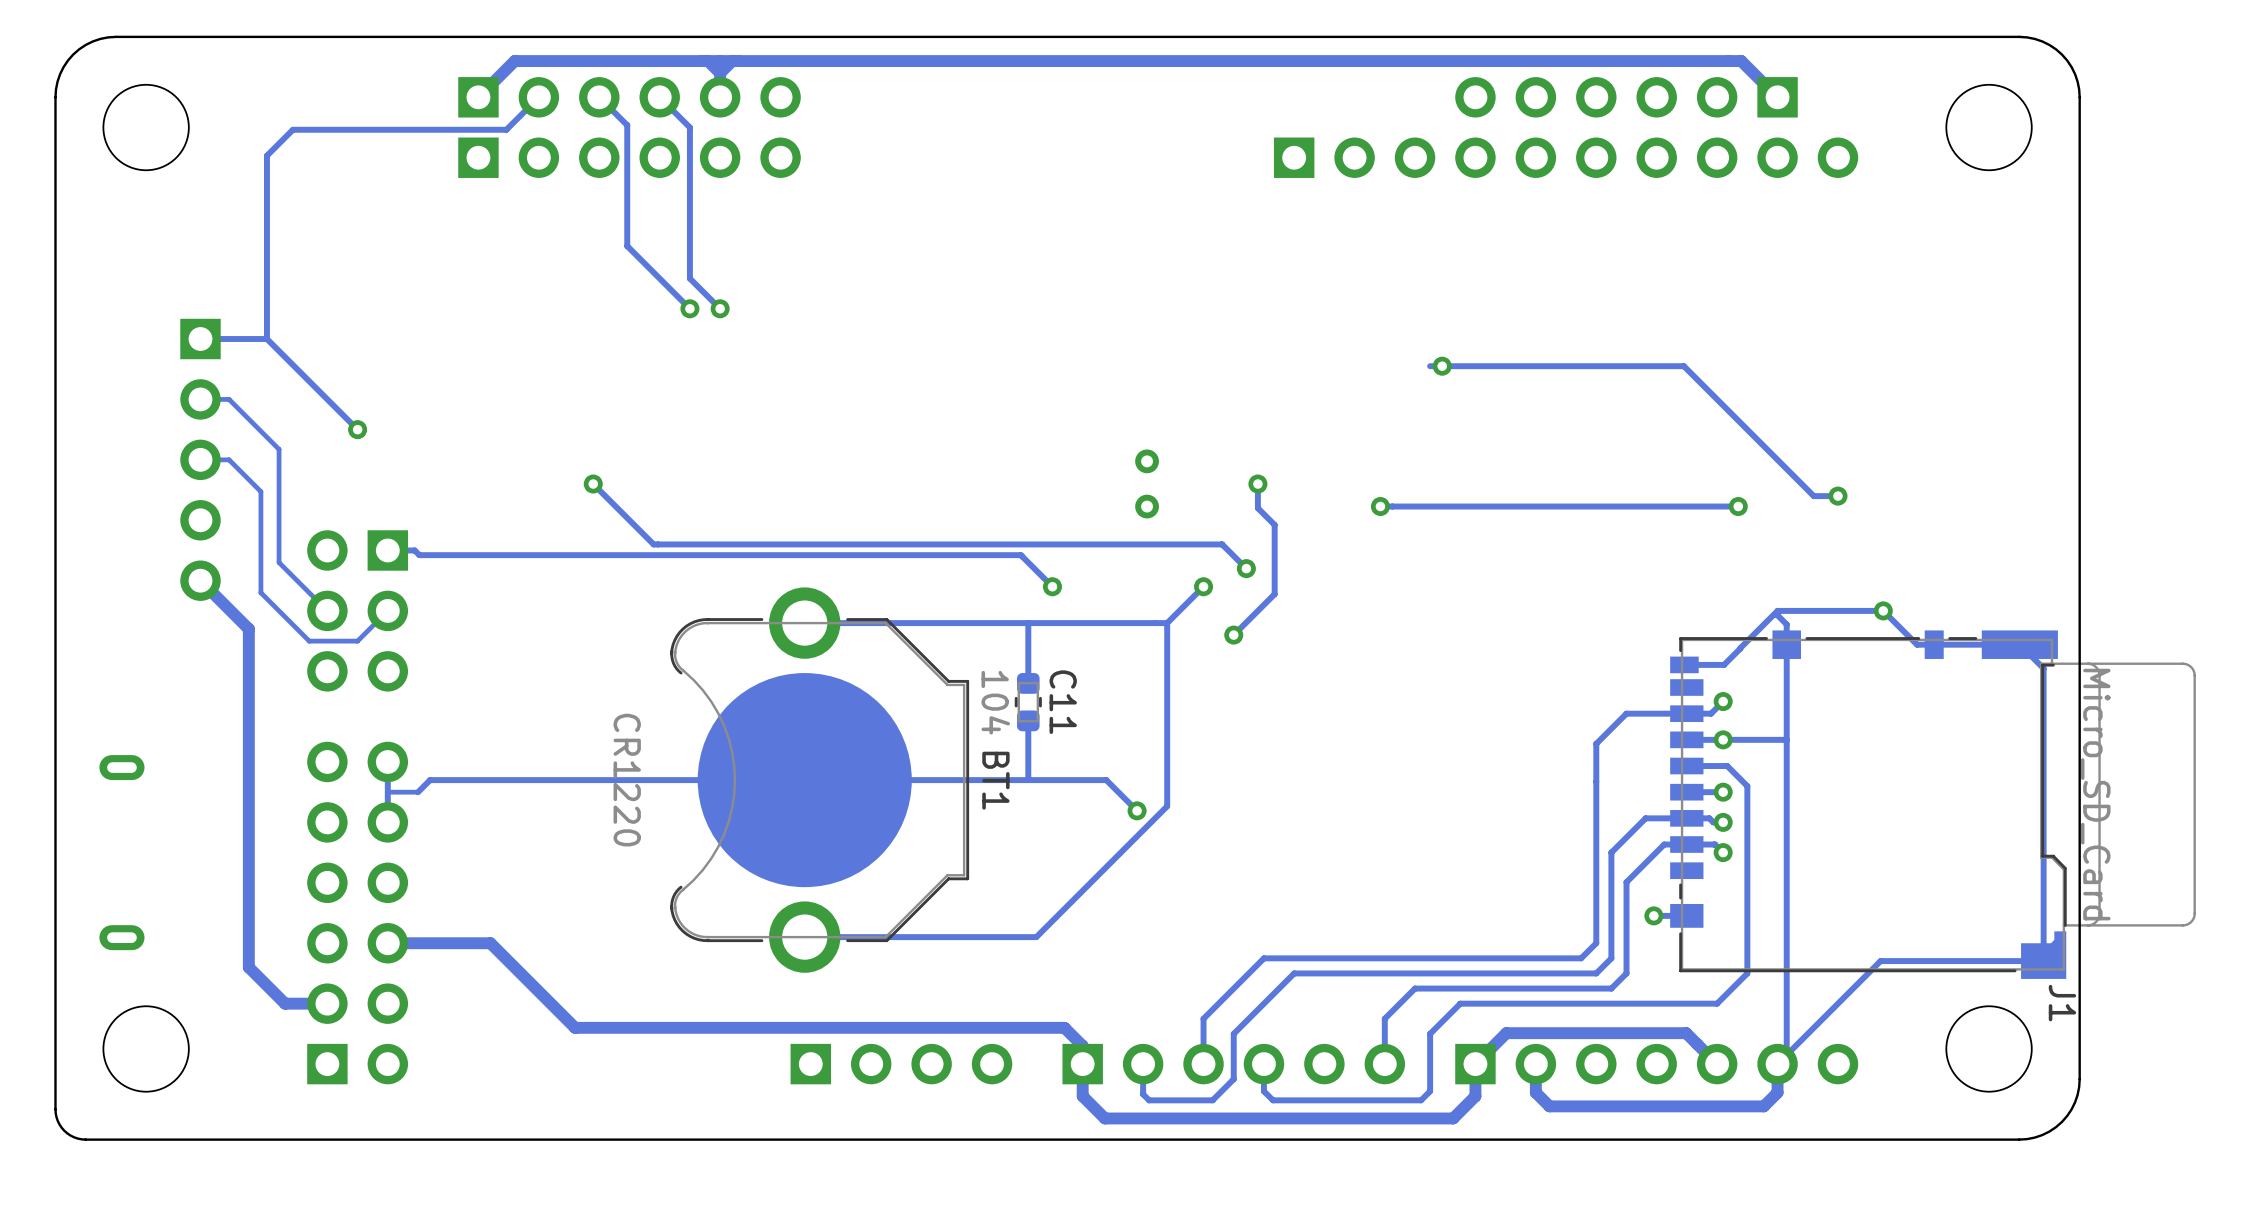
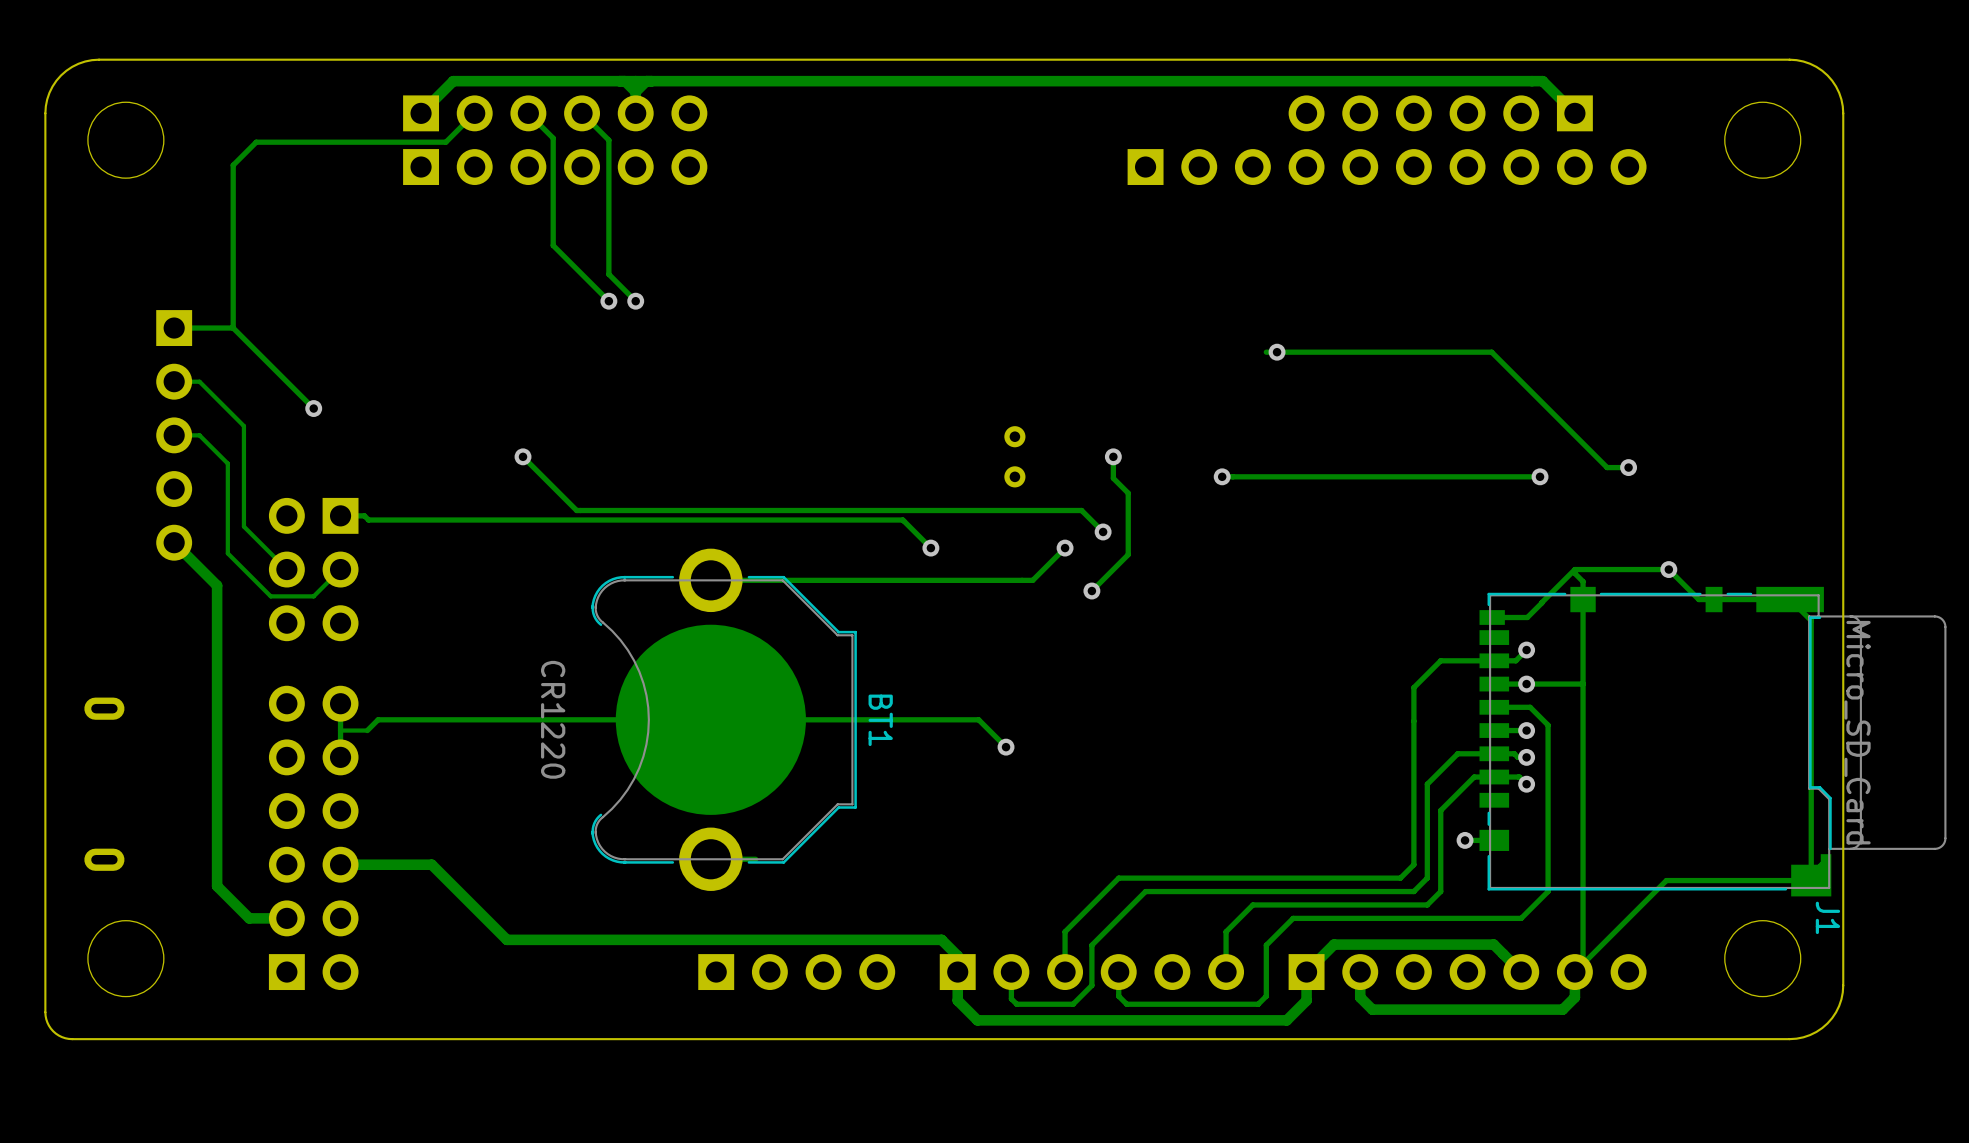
track: (1028, 623) (1028, 683) -> none
track: (1167, 623) (1167, 806) (1036, 937) (855, 937) -> none
C11: 104 (1028, 702) -> none
track: (1028, 720) (1028, 780) -> none

